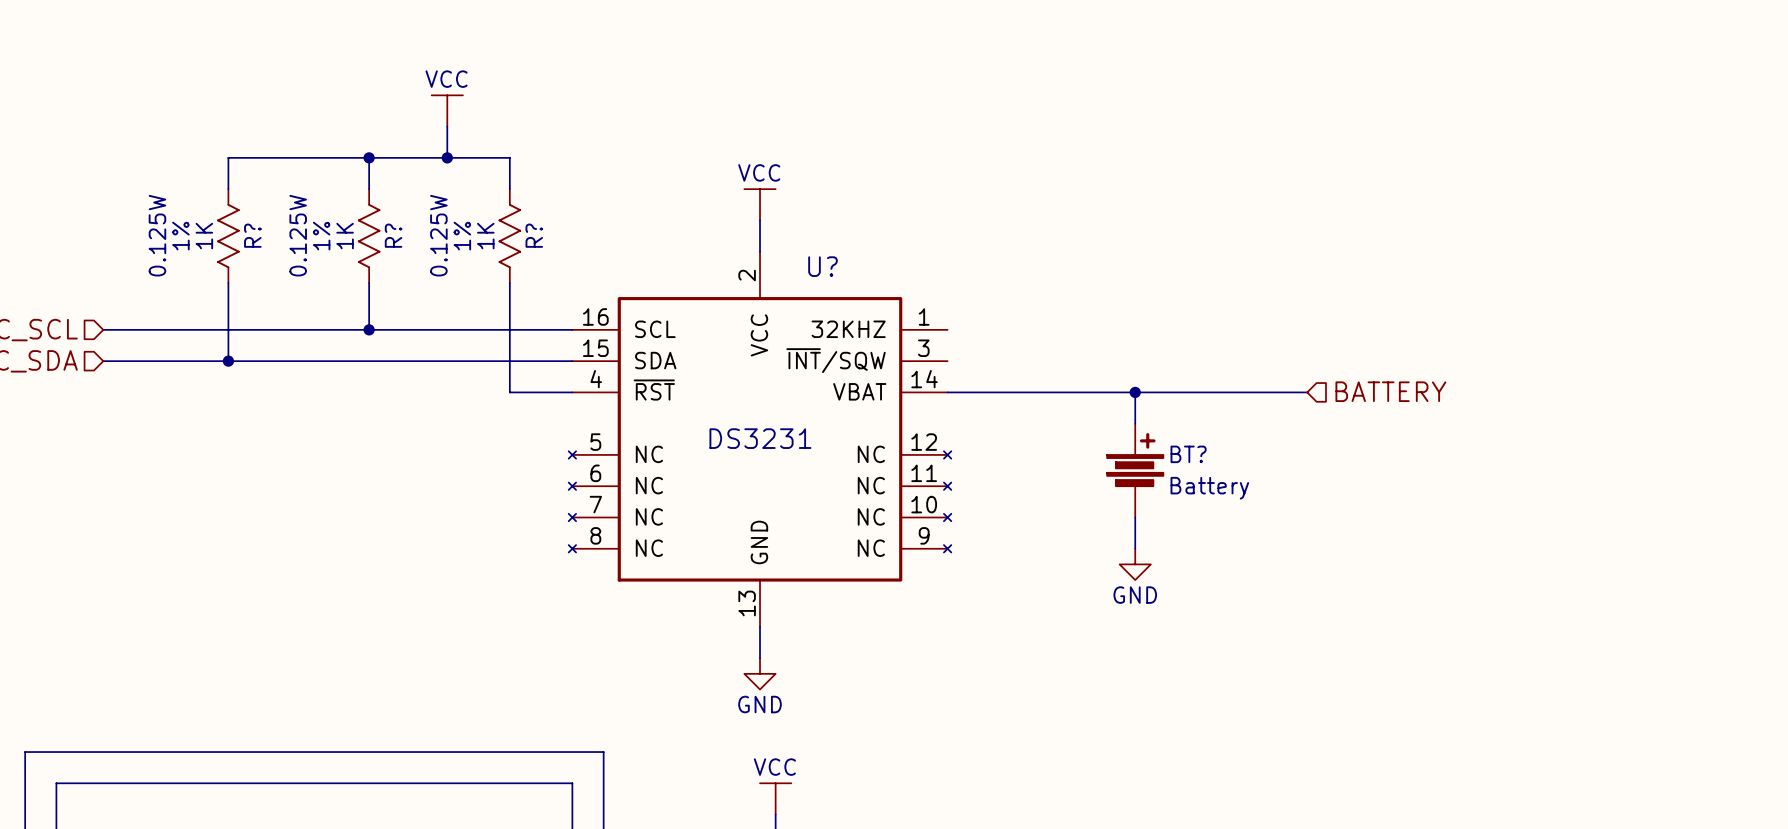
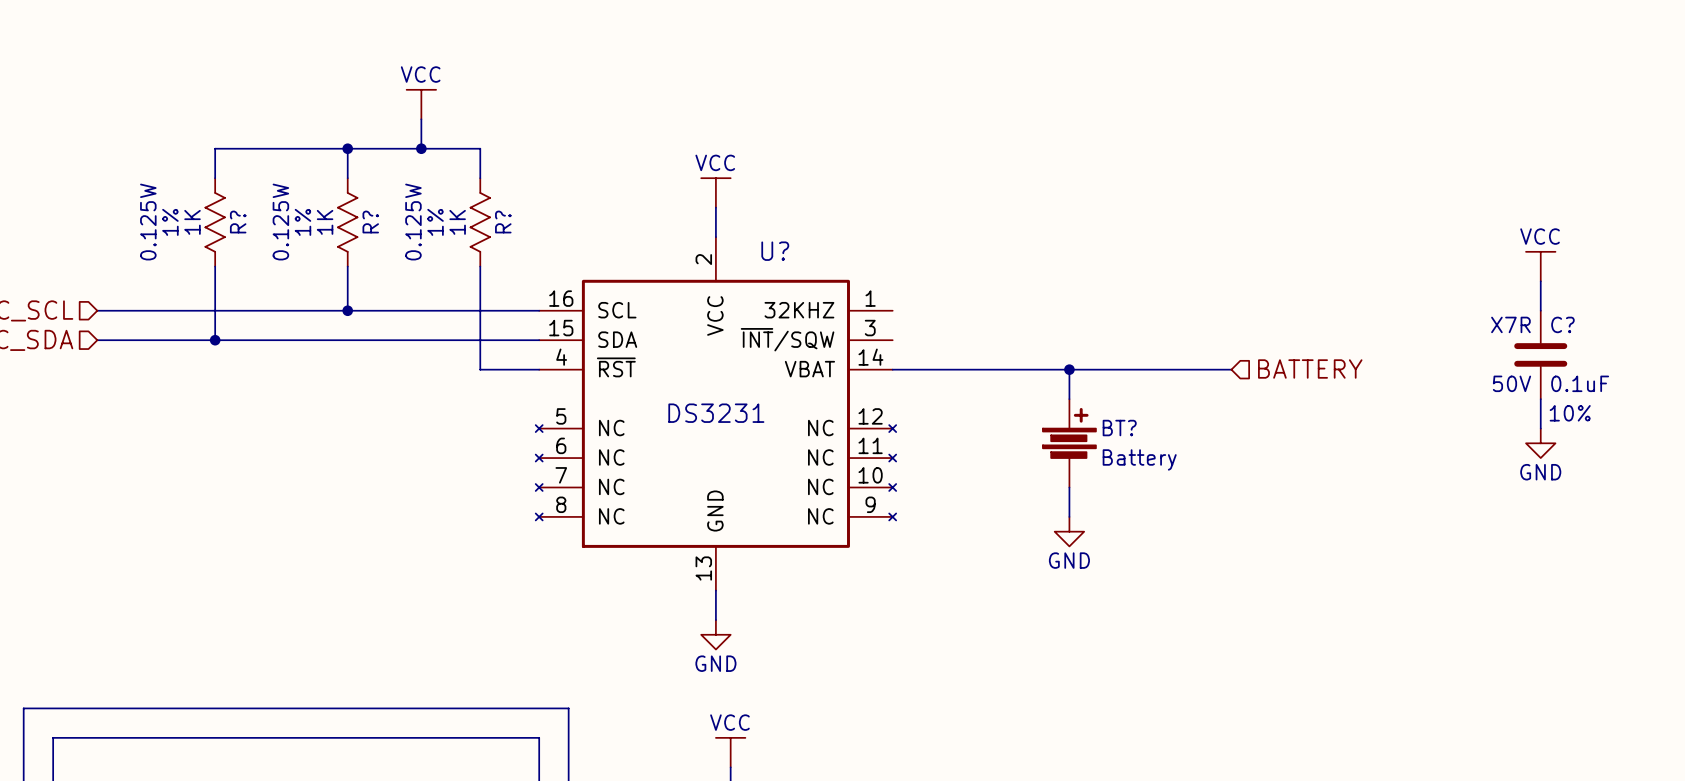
power symbol: none -> VCC (1540, 266)
wire: none -> (1540, 281) (1540, 310)
C?: none -> 0.1uF (1540, 354)
wire: none -> (1540, 399) (1540, 428)
power symbol: none -> GND (1540, 443)

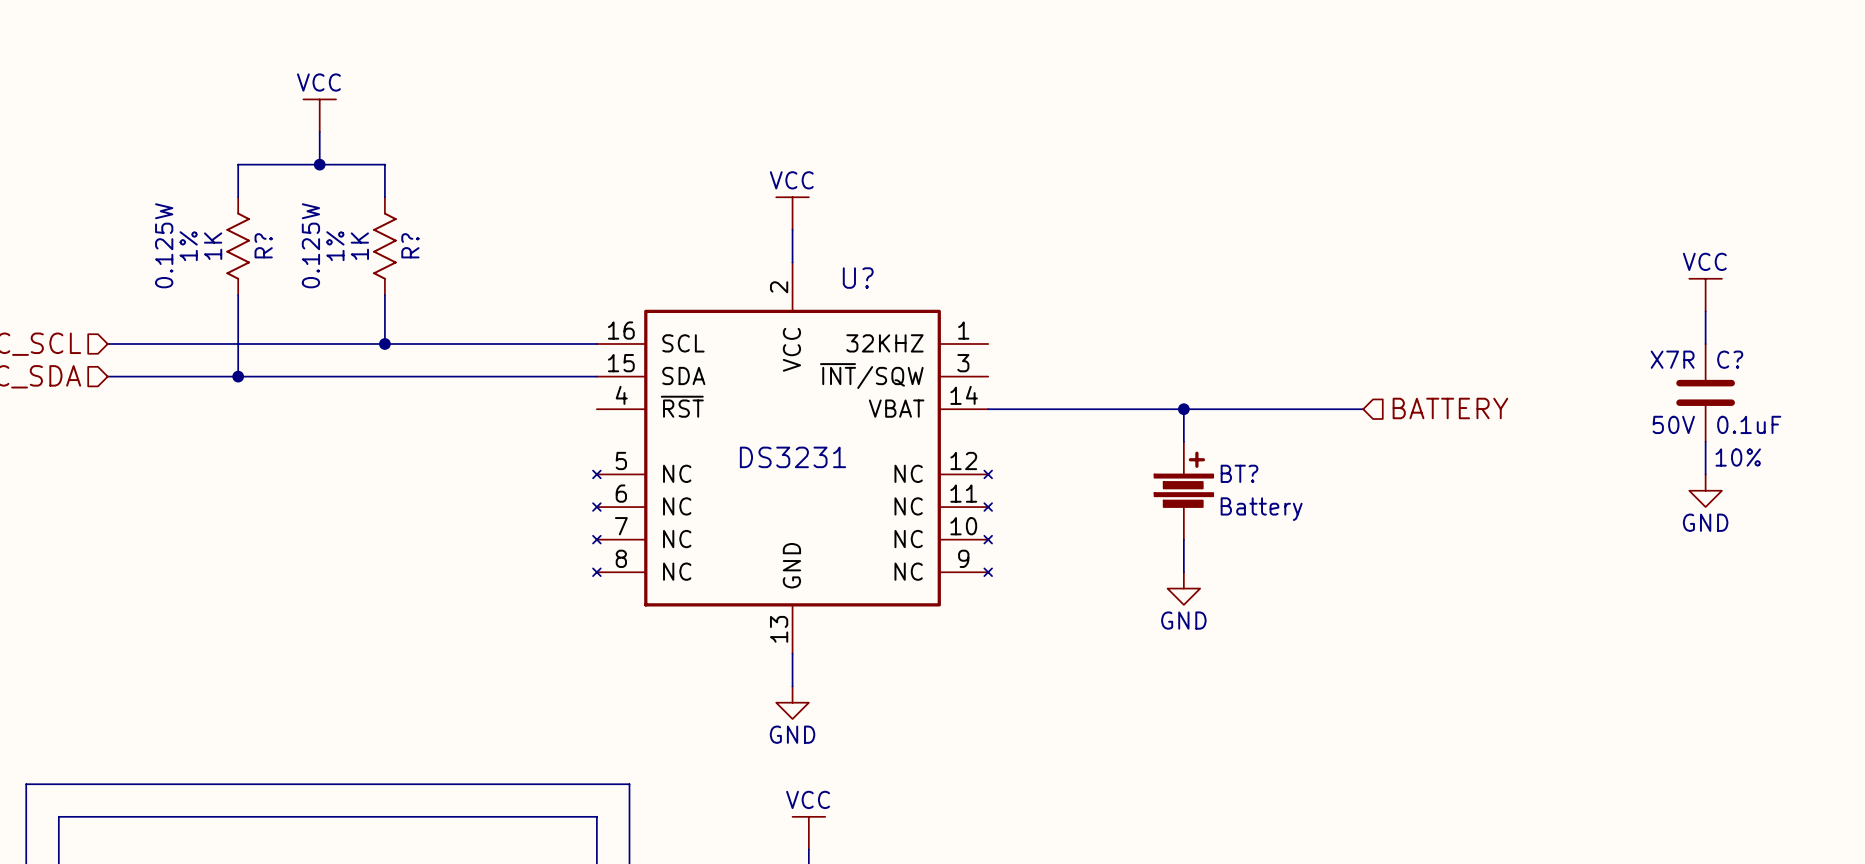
power symbol position: VCC (421, 104) -> VCC (319, 115)
wire: (421, 119) (421, 148) -> (319, 132) (319, 164)
wire: (347, 148) (480, 148) (480, 178) -> none
junction position: (347, 148) -> (319, 164)
junction: (421, 148) -> none
R?: 1K (480, 222) -> none
wire: (480, 266) (480, 369) (539, 369) -> none

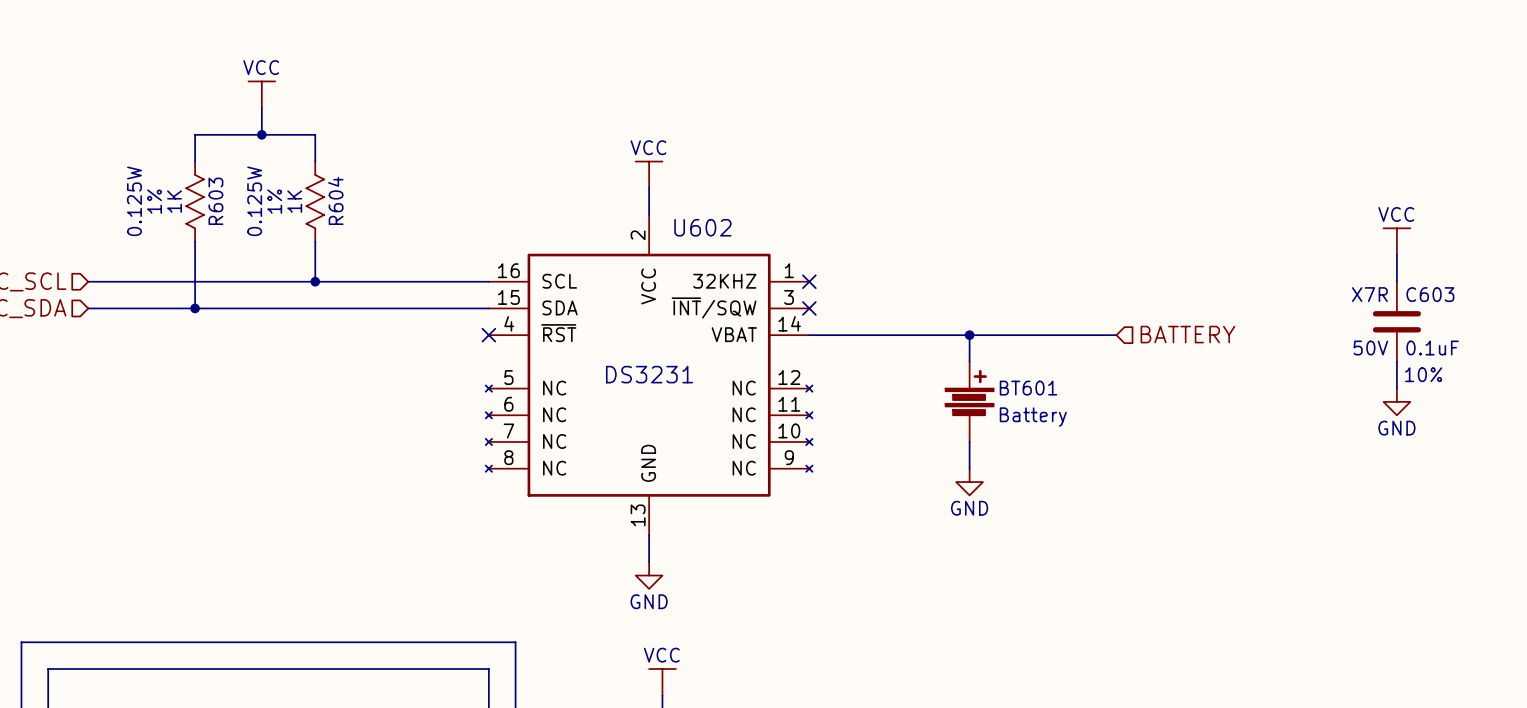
R? name: R? (263, 245) -> R603 (215, 201)
R? name: R? (410, 245) -> R604 (335, 200)
U? name: U? (858, 278) -> U602 (702, 227)
no-connect mark: none -> (809, 281)
C? name: C? (1730, 359) -> C603 (1430, 294)
no-connect mark: none -> (809, 308)
no-connect mark: none -> (488, 335)
BT? name: BT? (1239, 473) -> BT601 (1028, 388)

